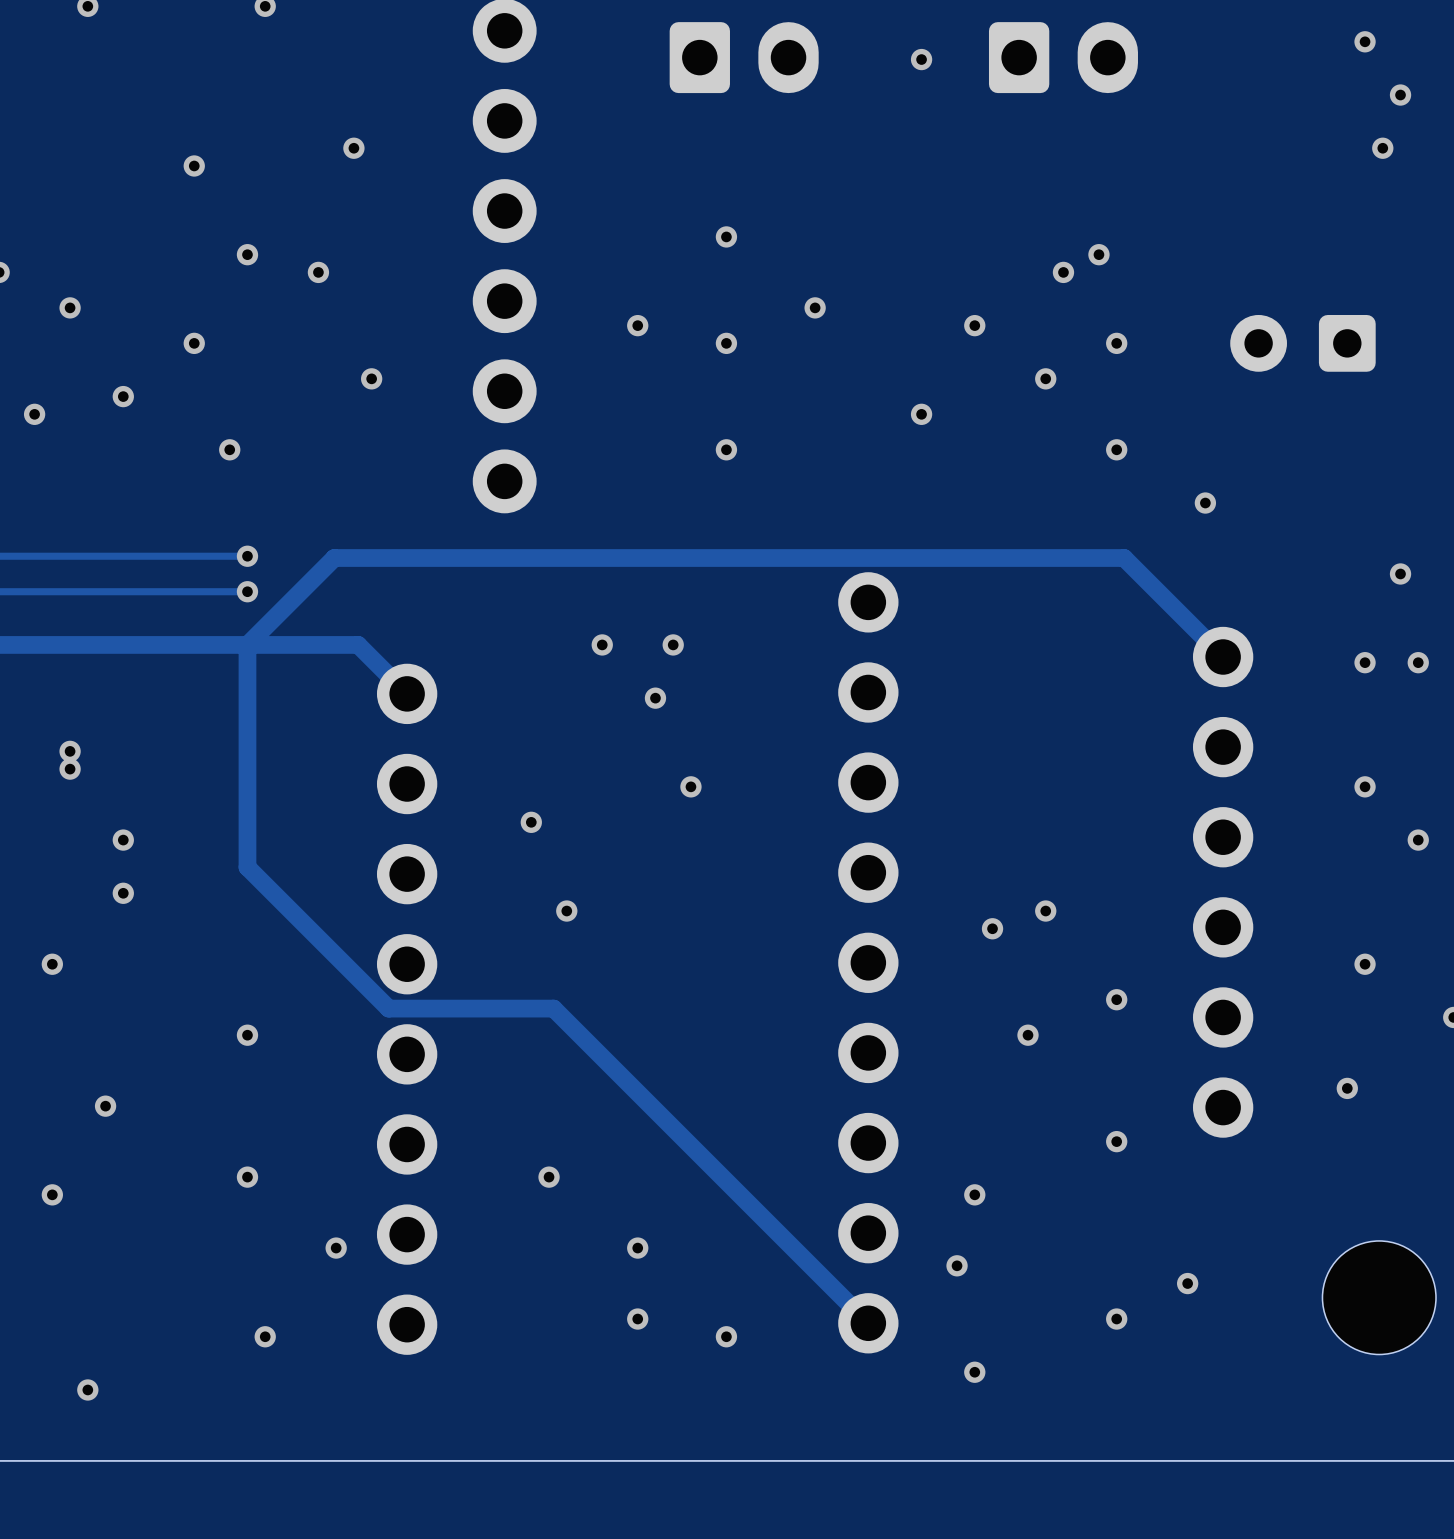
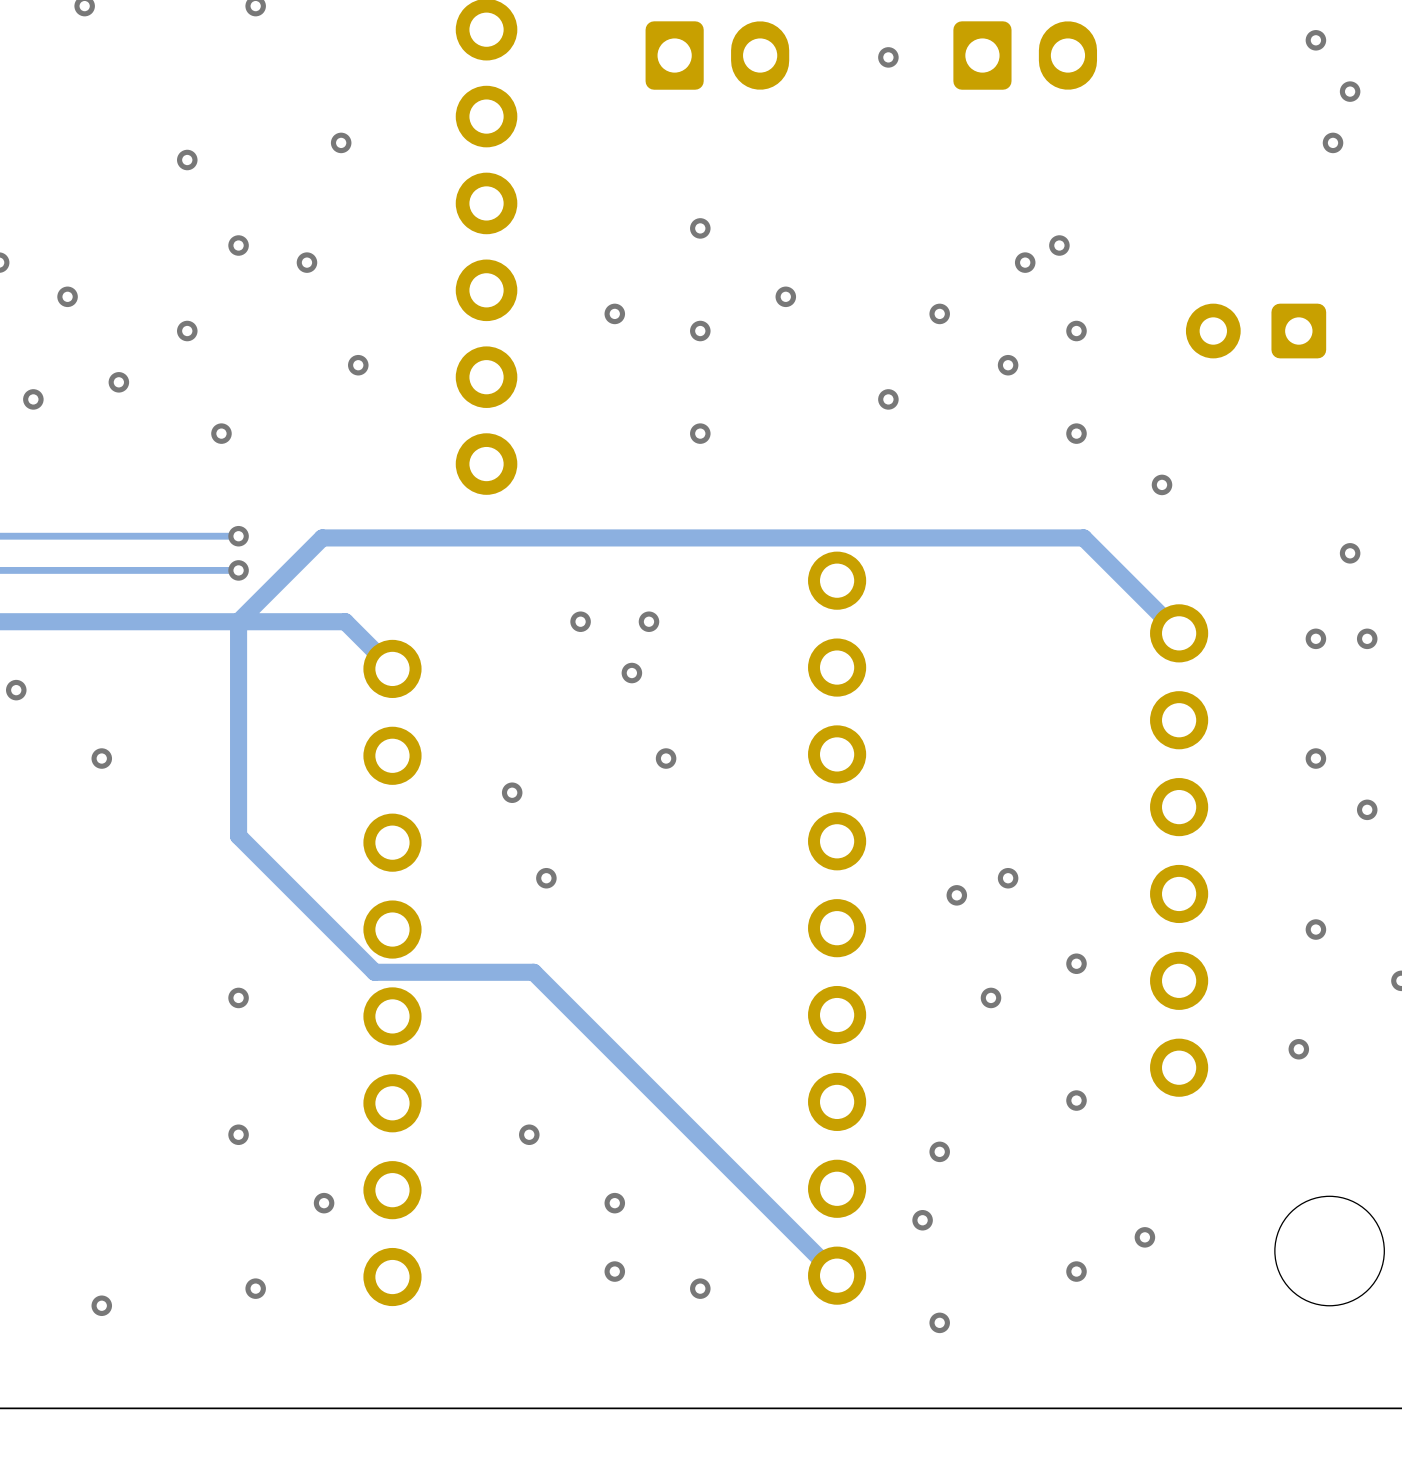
via: none -> (16, 690)
via: (70, 751) -> none
via: (70, 769) -> none
via: none -> (101, 758)
via: (123, 840) -> none
via: (123, 893) -> none
via: (52, 964) -> none
via: (105, 1106) -> none
via: (52, 1194) -> none
via position: (87, 1389) -> (101, 1305)

